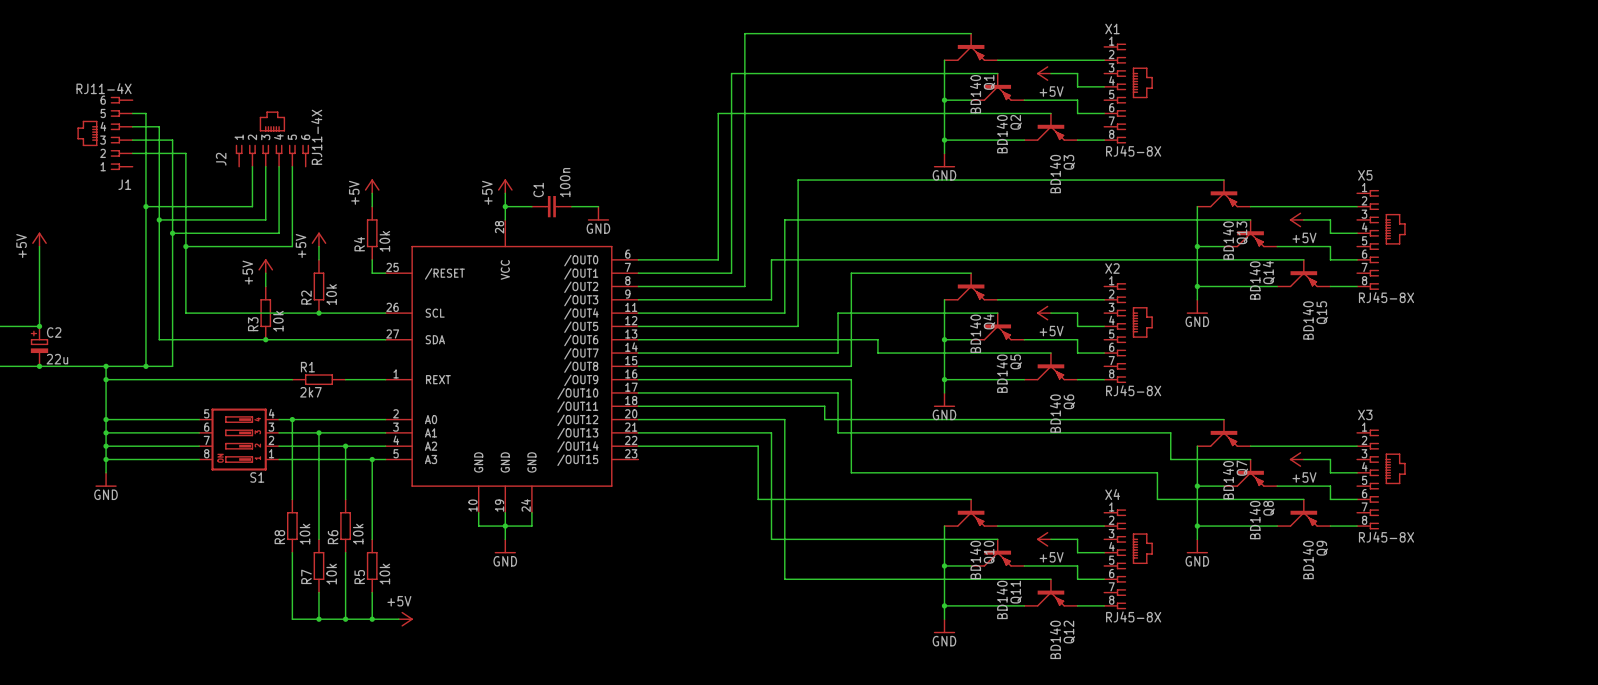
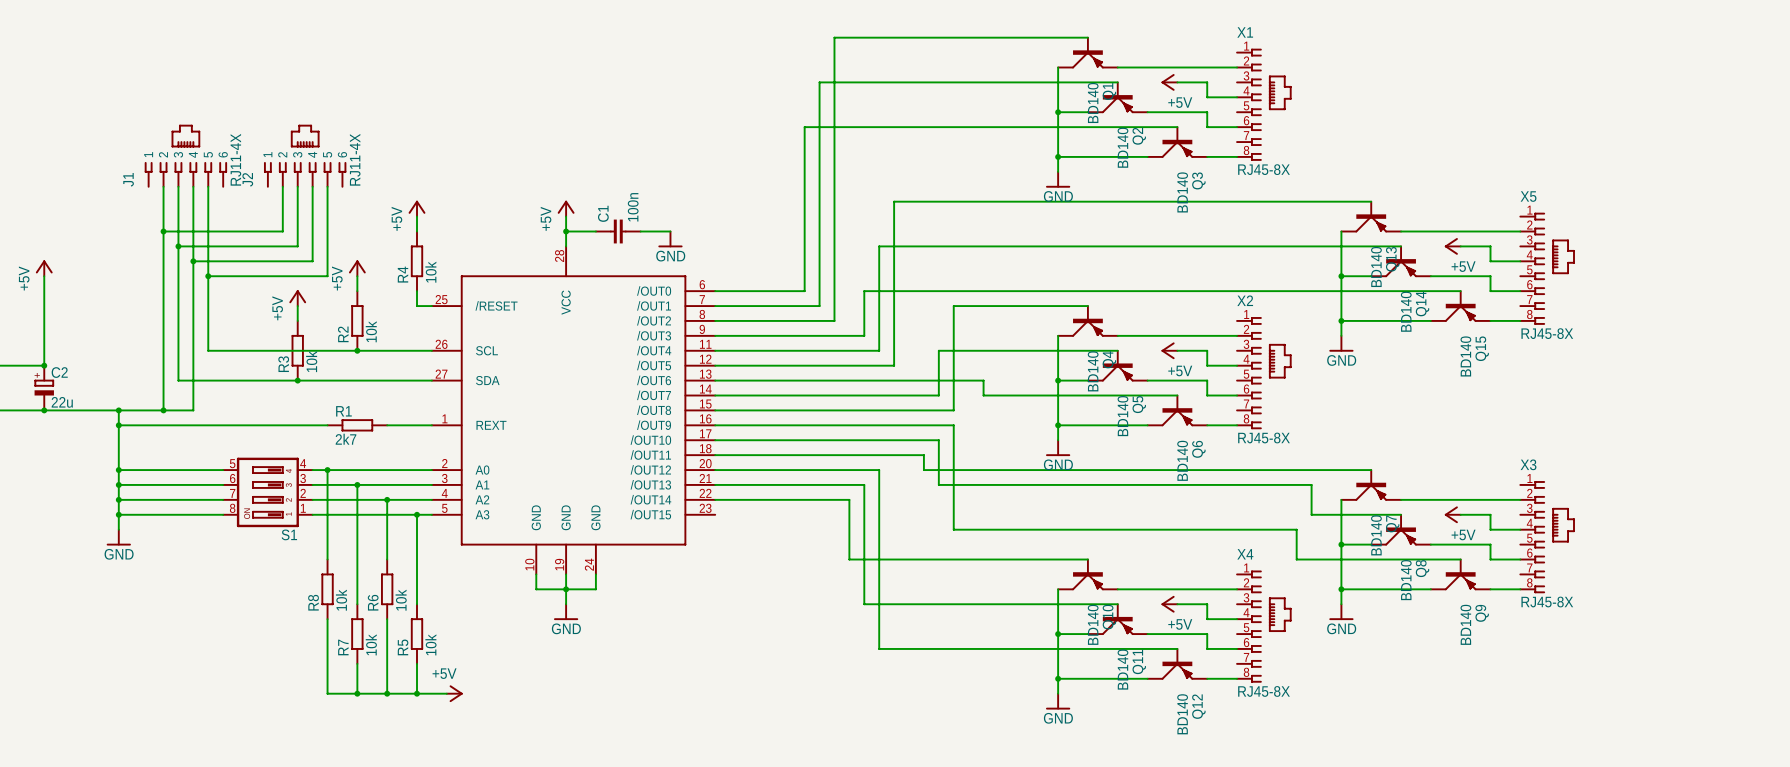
wire: (132, 113) (145, 113) (145, 166) -> none
wire: (132, 126) (159, 126) (159, 166) -> none
J1 rotation: 0° (98, 133) -> 90° clockwise (185, 148)
J1 position: (105, 133) -> (185, 155)
wire: (132, 140) (172, 140) (172, 166) -> none

